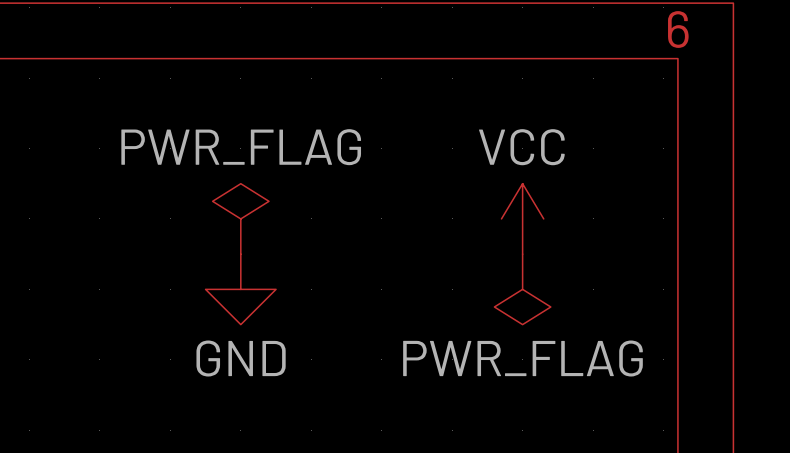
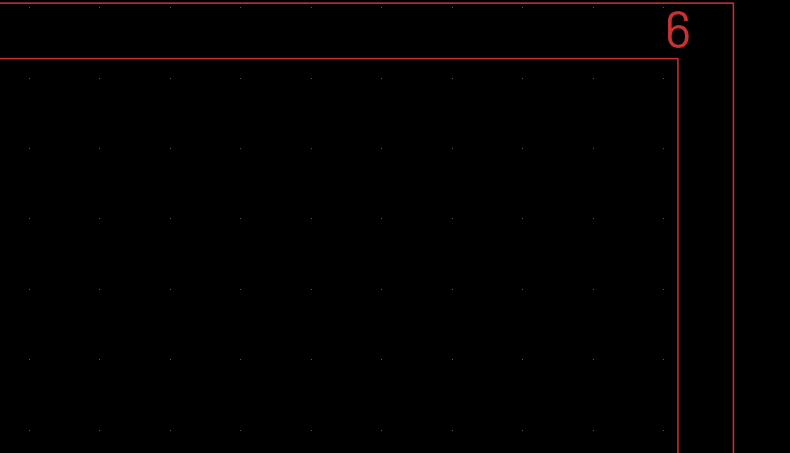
power symbol: PWR_FLAG (240, 218) -> none
power symbol: VCC (522, 218) -> none
power symbol: GND (240, 289) -> none
power symbol: PWR_FLAG (522, 289) -> none

